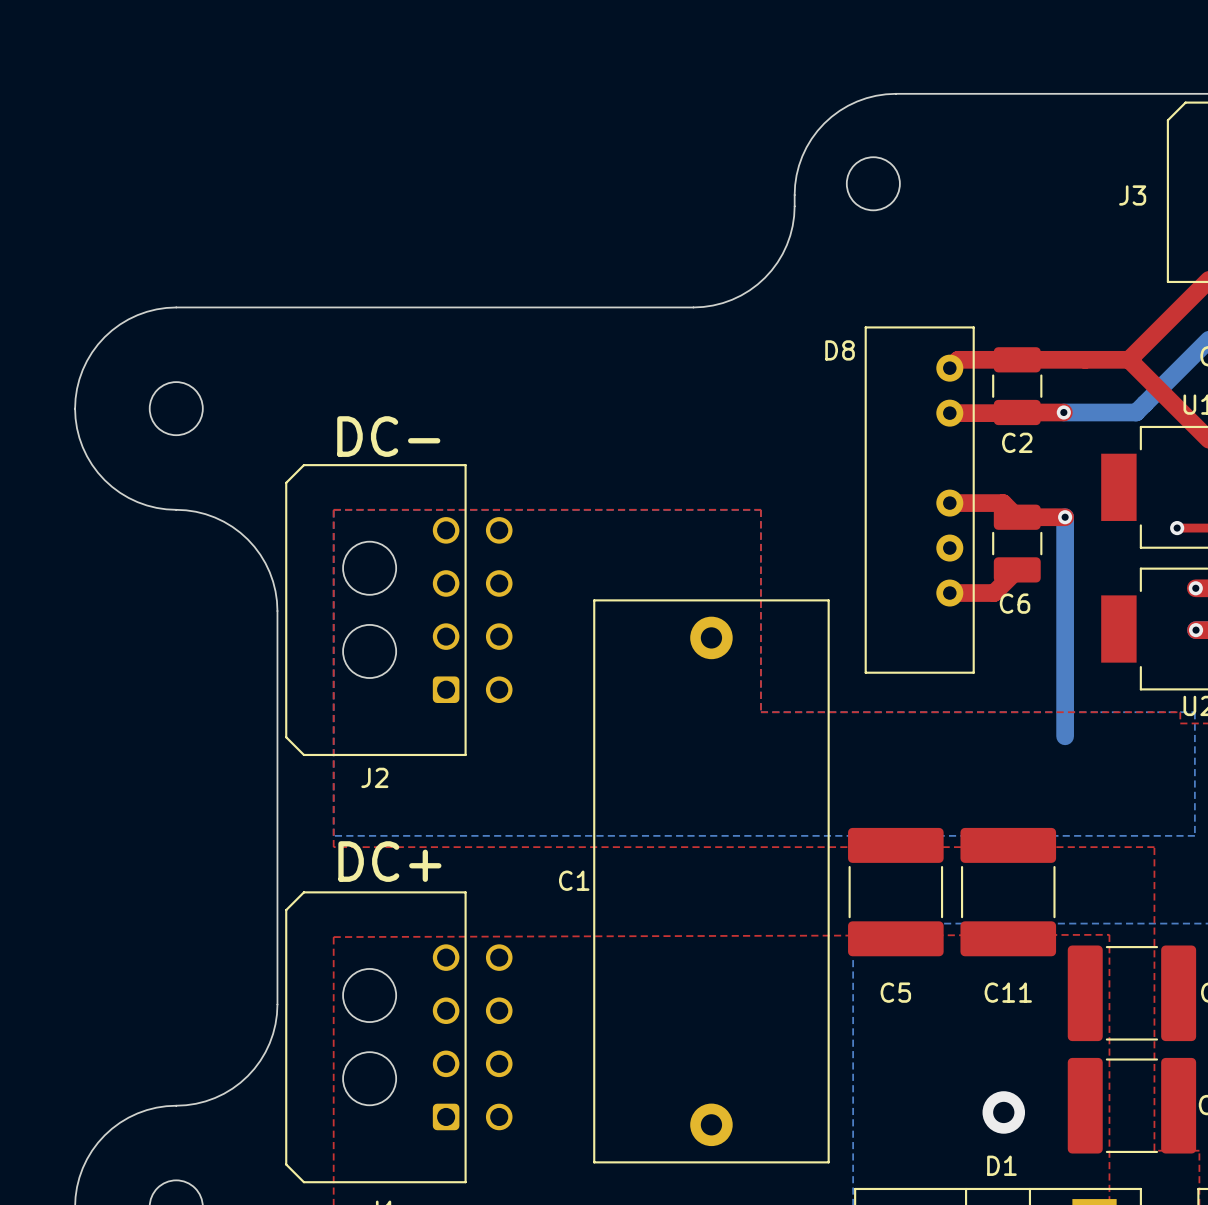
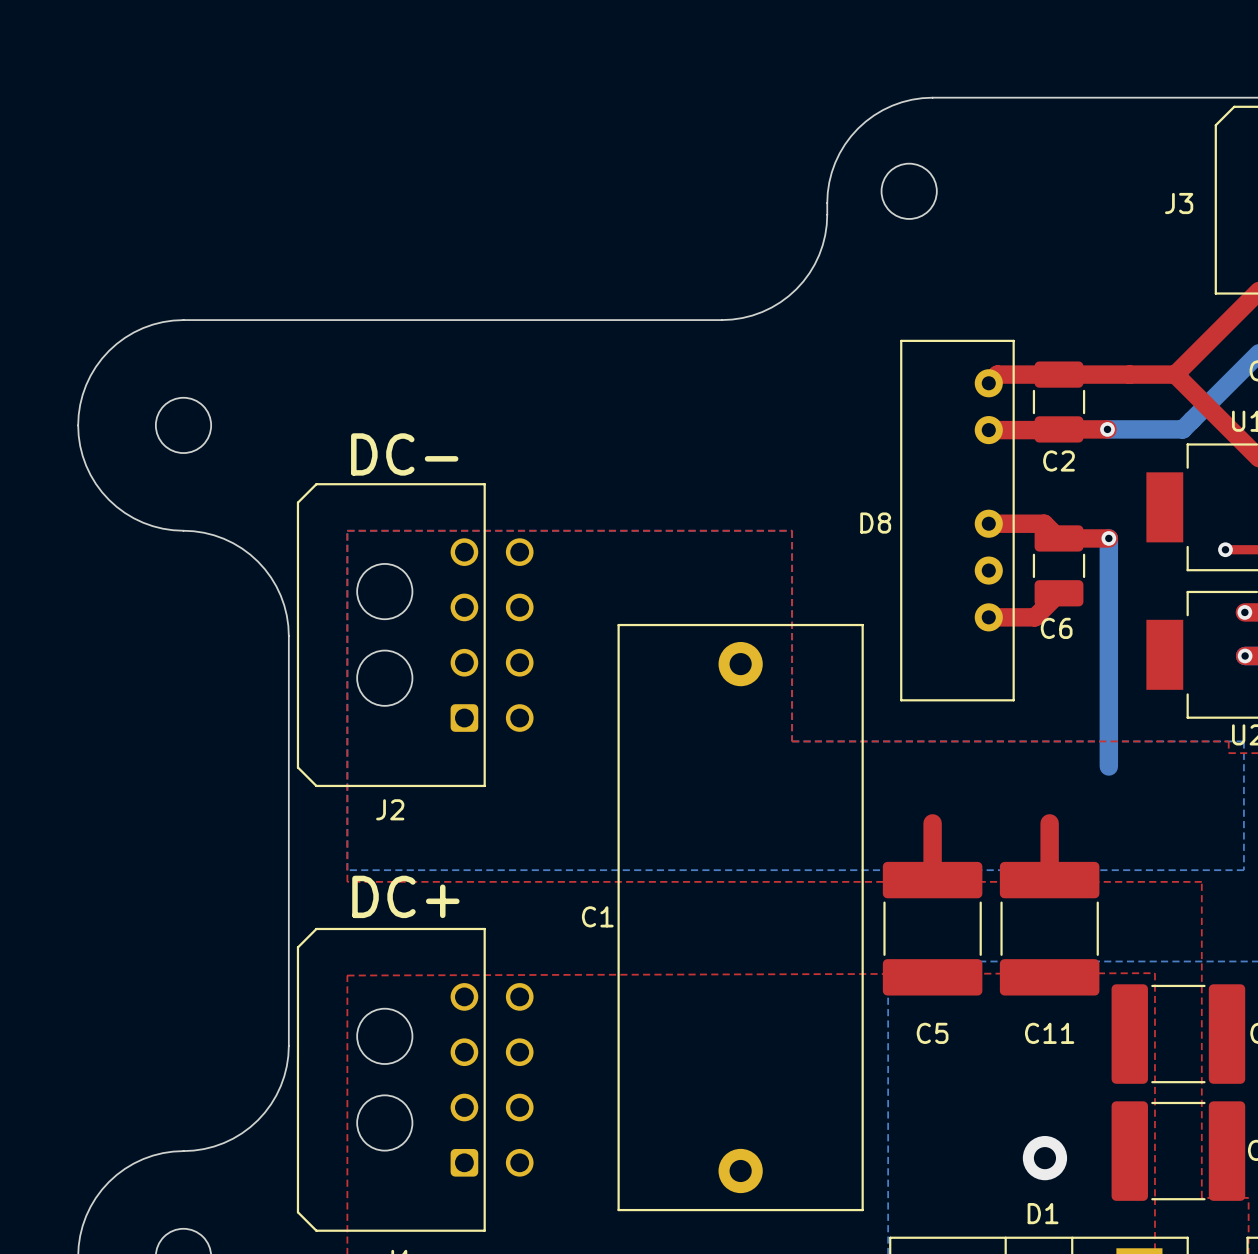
D8 name position: D8 (840, 350) -> D8 (875, 523)
top track: none -> (932, 823) (932, 880)
top track: none -> (1049, 823) (1049, 880)

